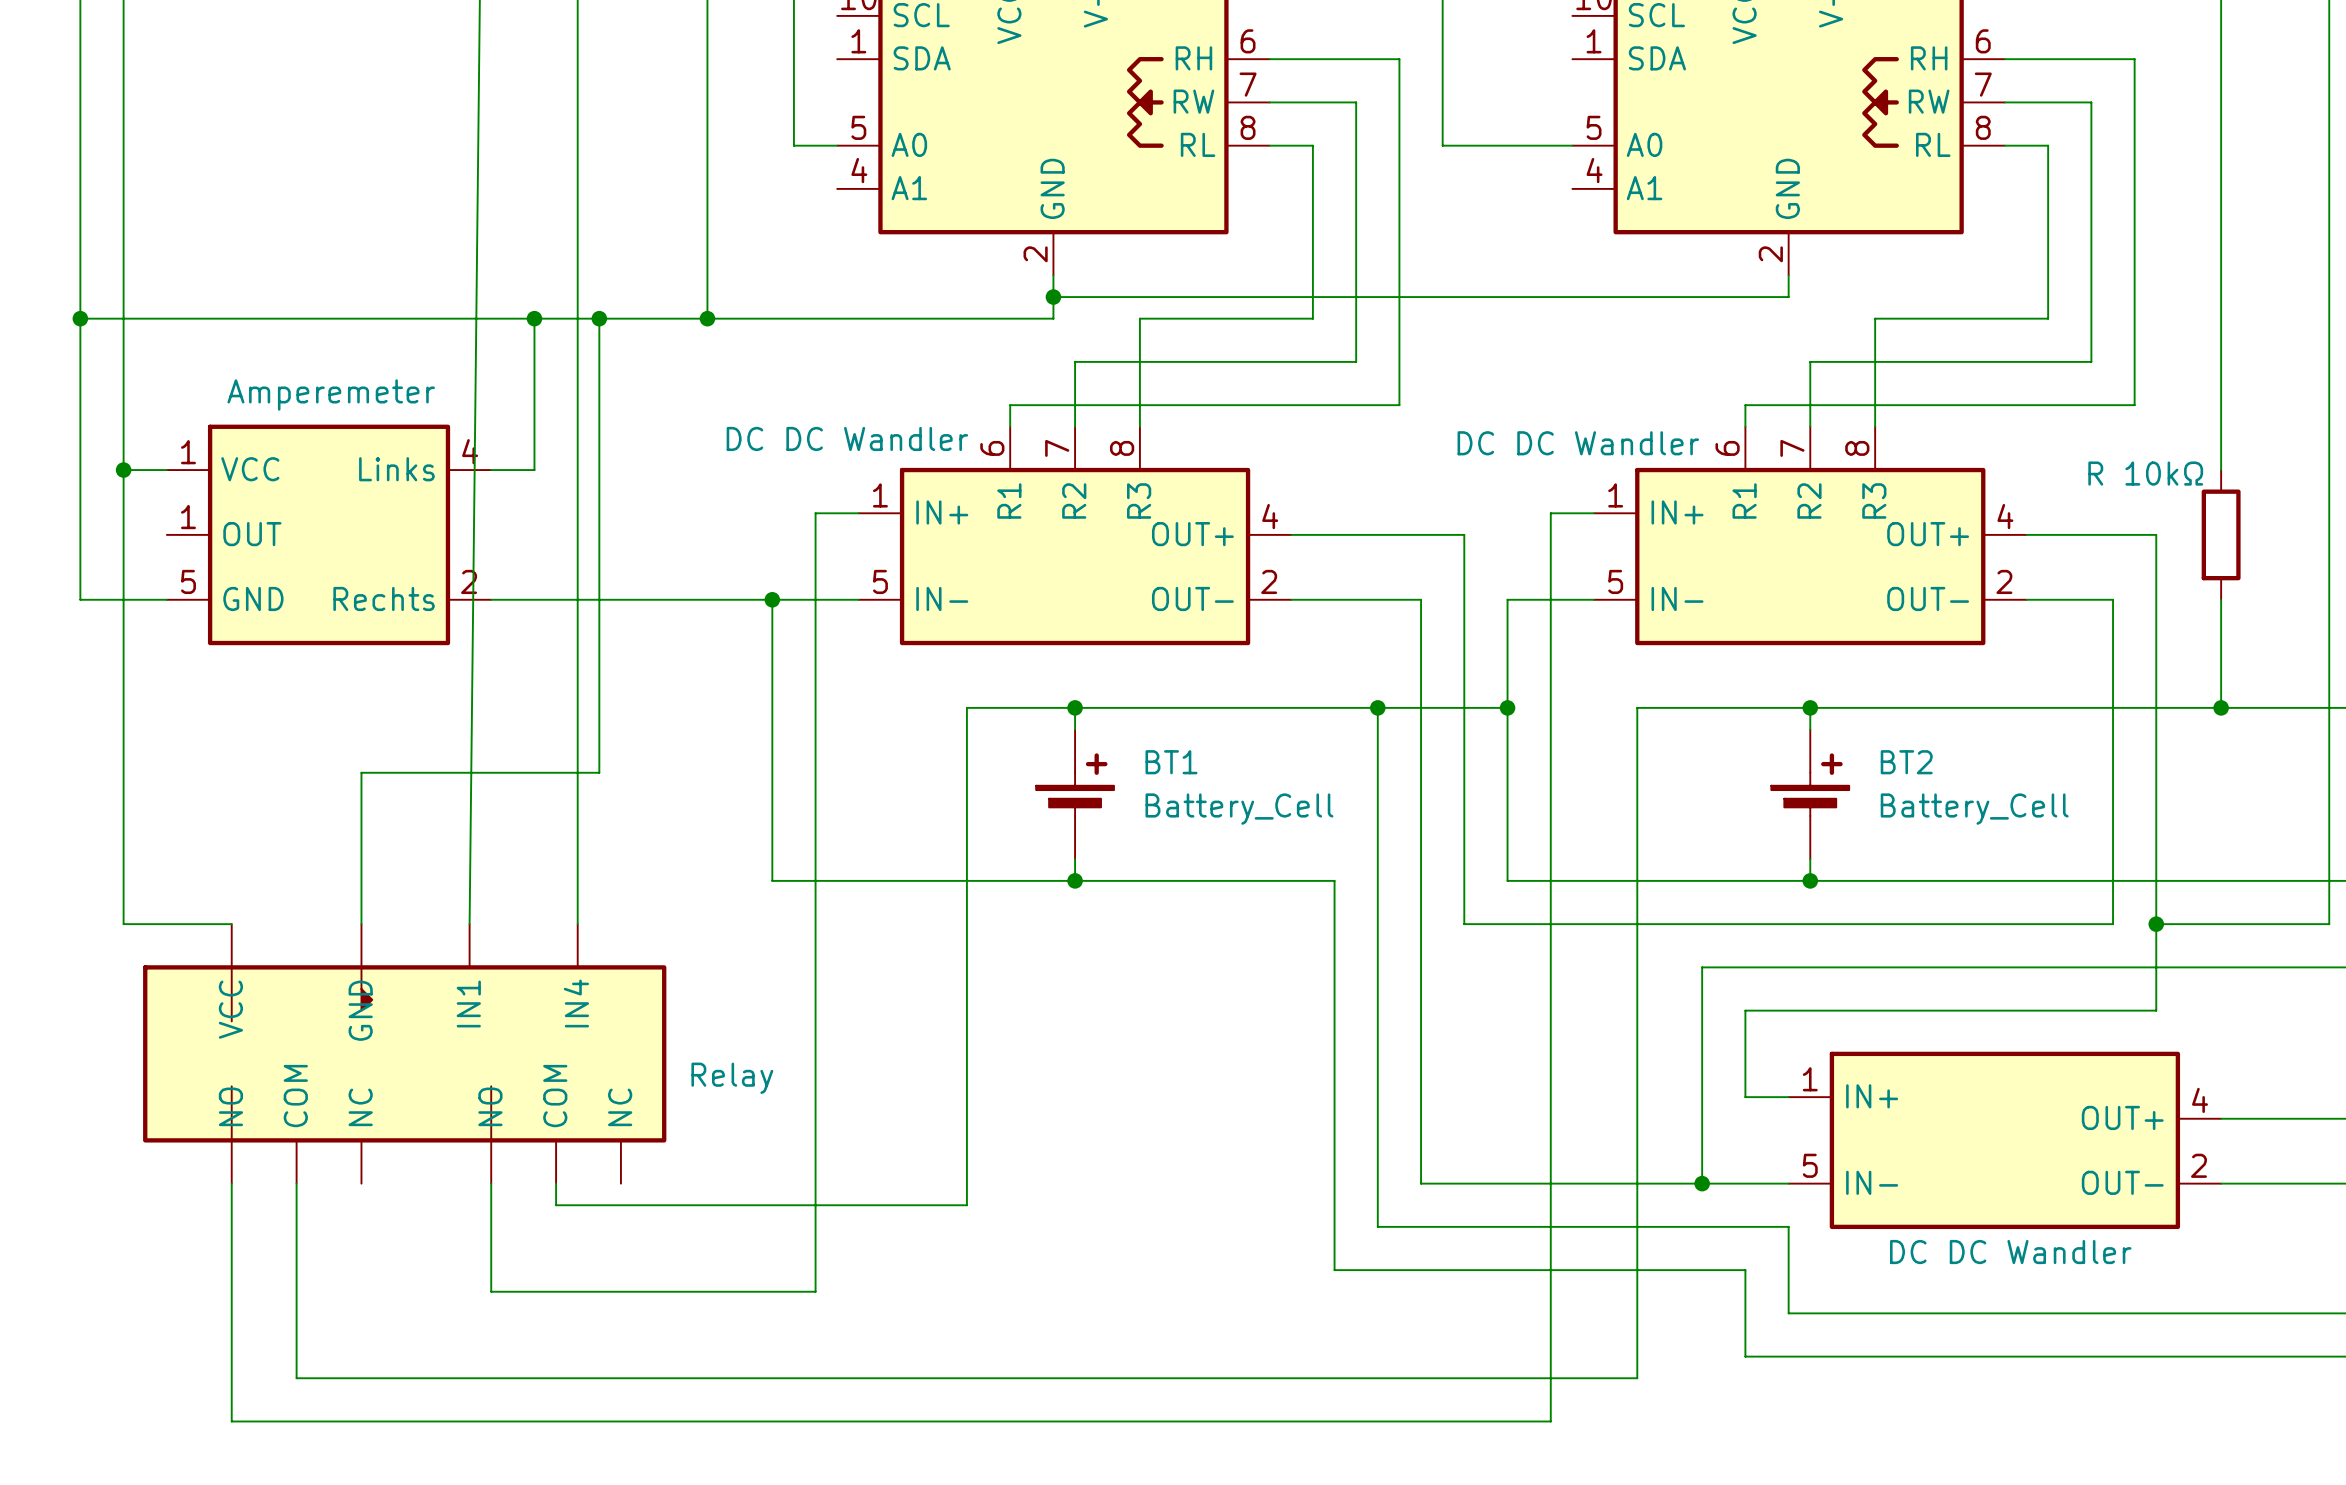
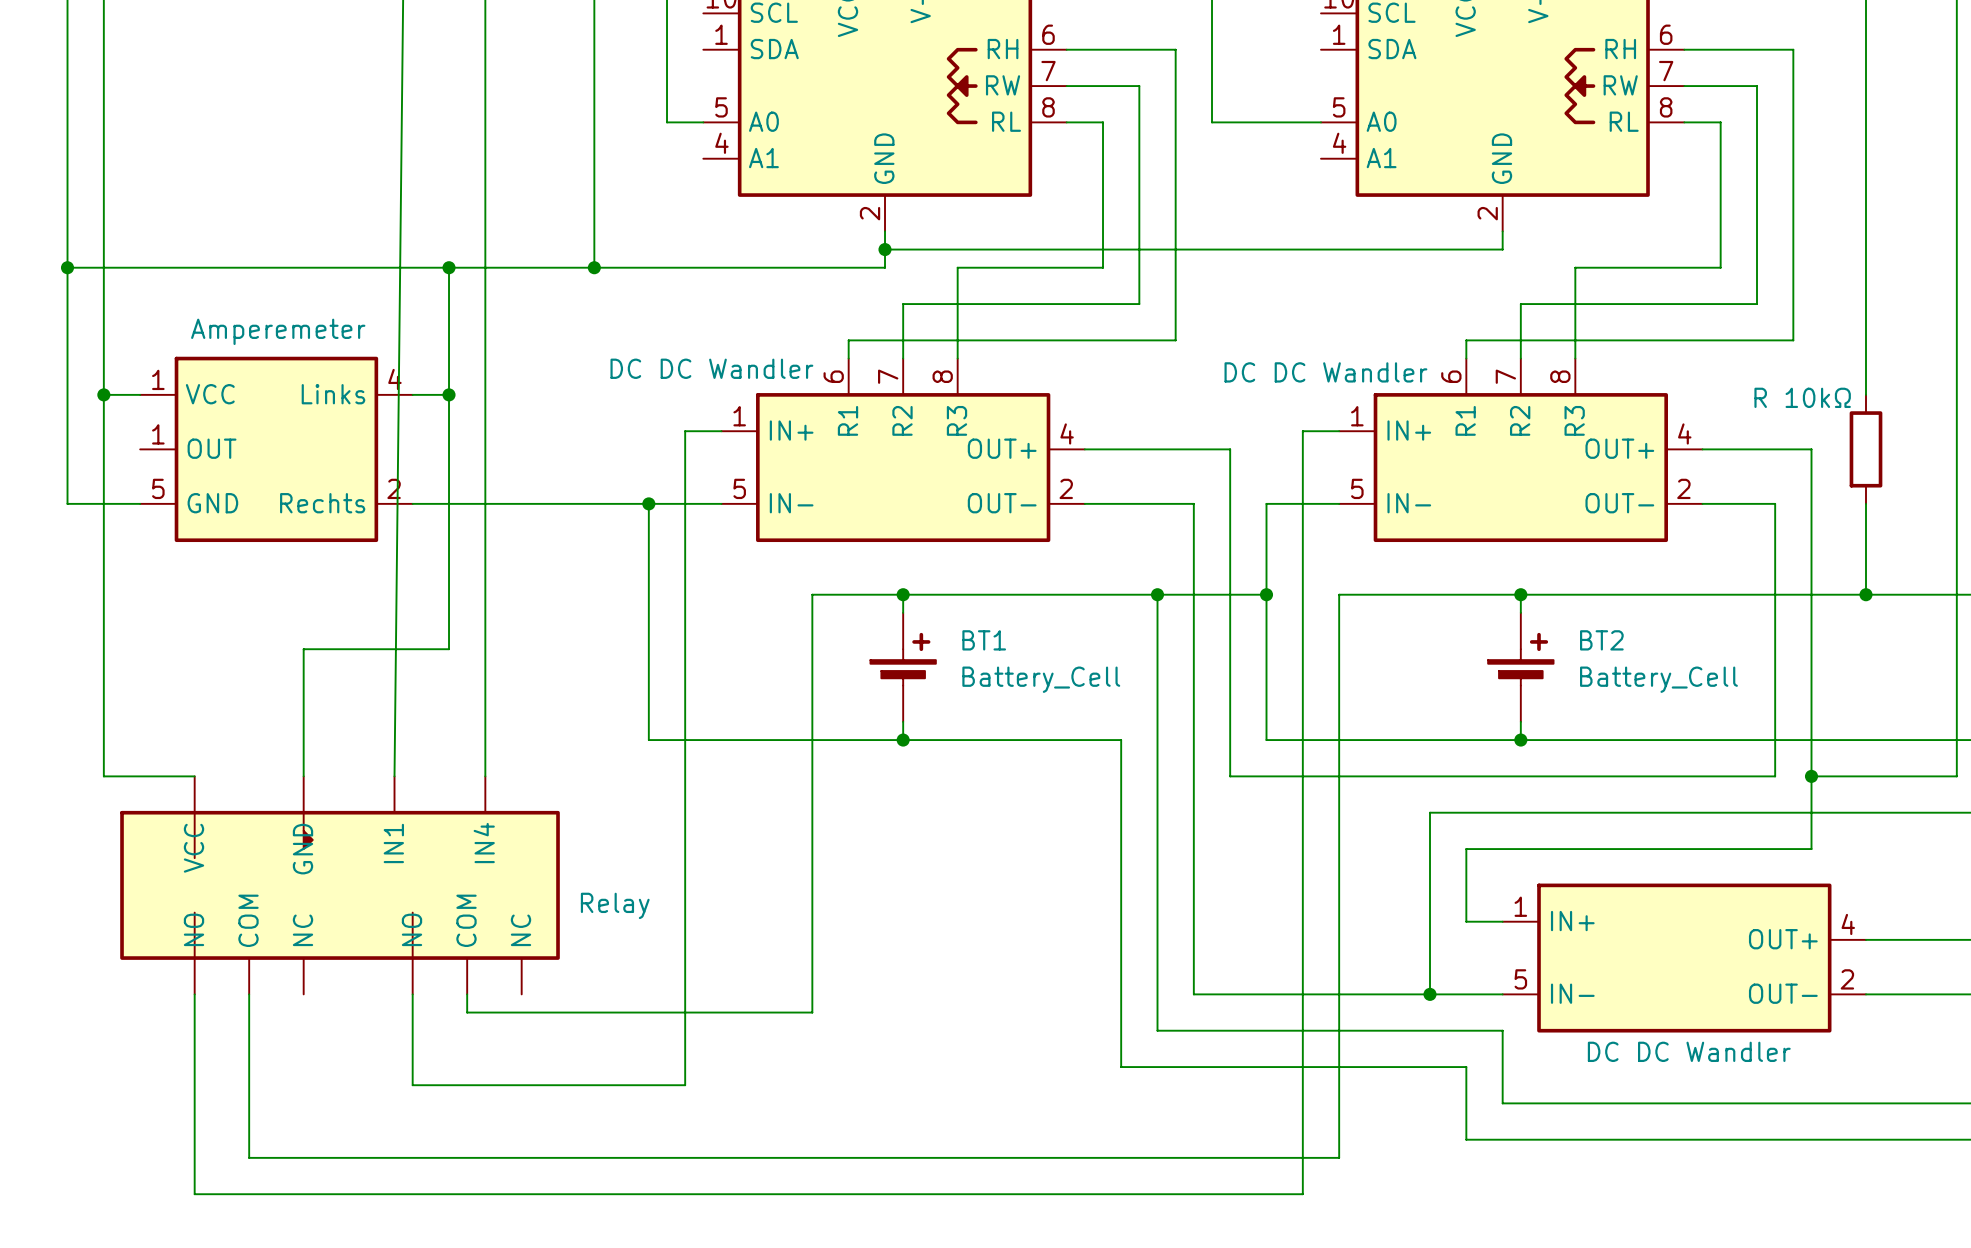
wire: (599, 318) (599, 772) (534, 772) -> (449, 394) (449, 649)
junction: (599, 318) -> none
junction: none -> (449, 394)
wire: (1637, 707) (1637, 1378) (1594, 1378) -> (1375, 594) (1339, 594) (1339, 1157)

